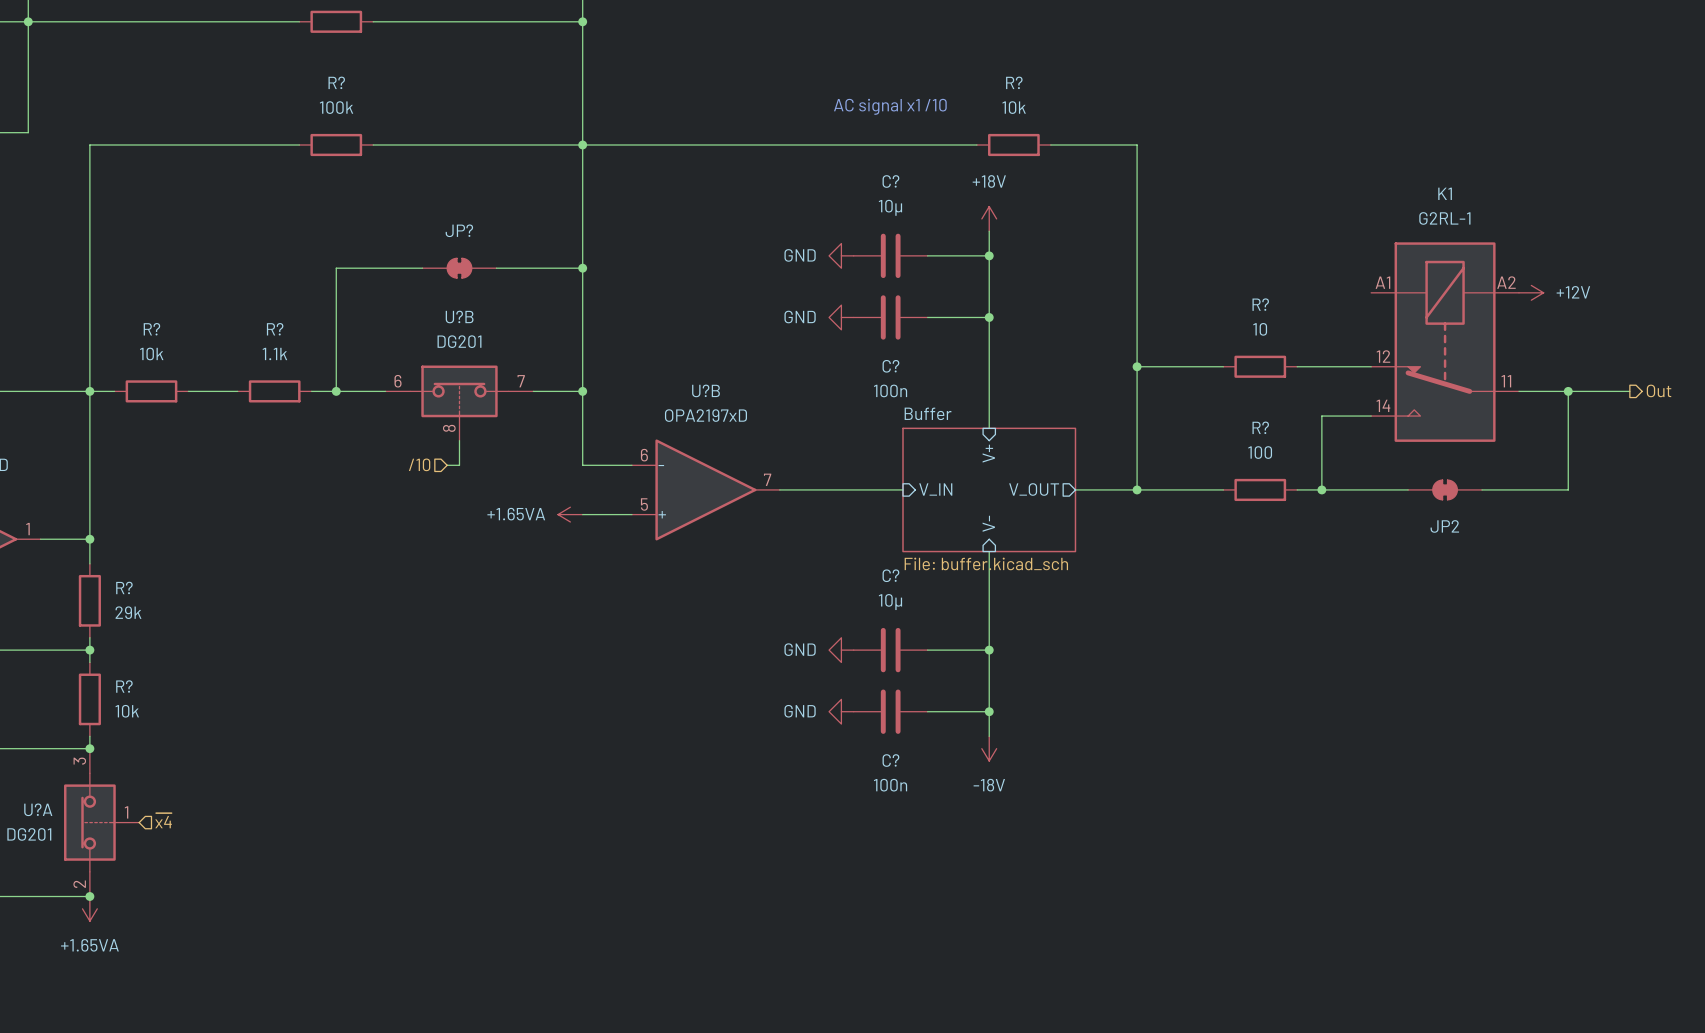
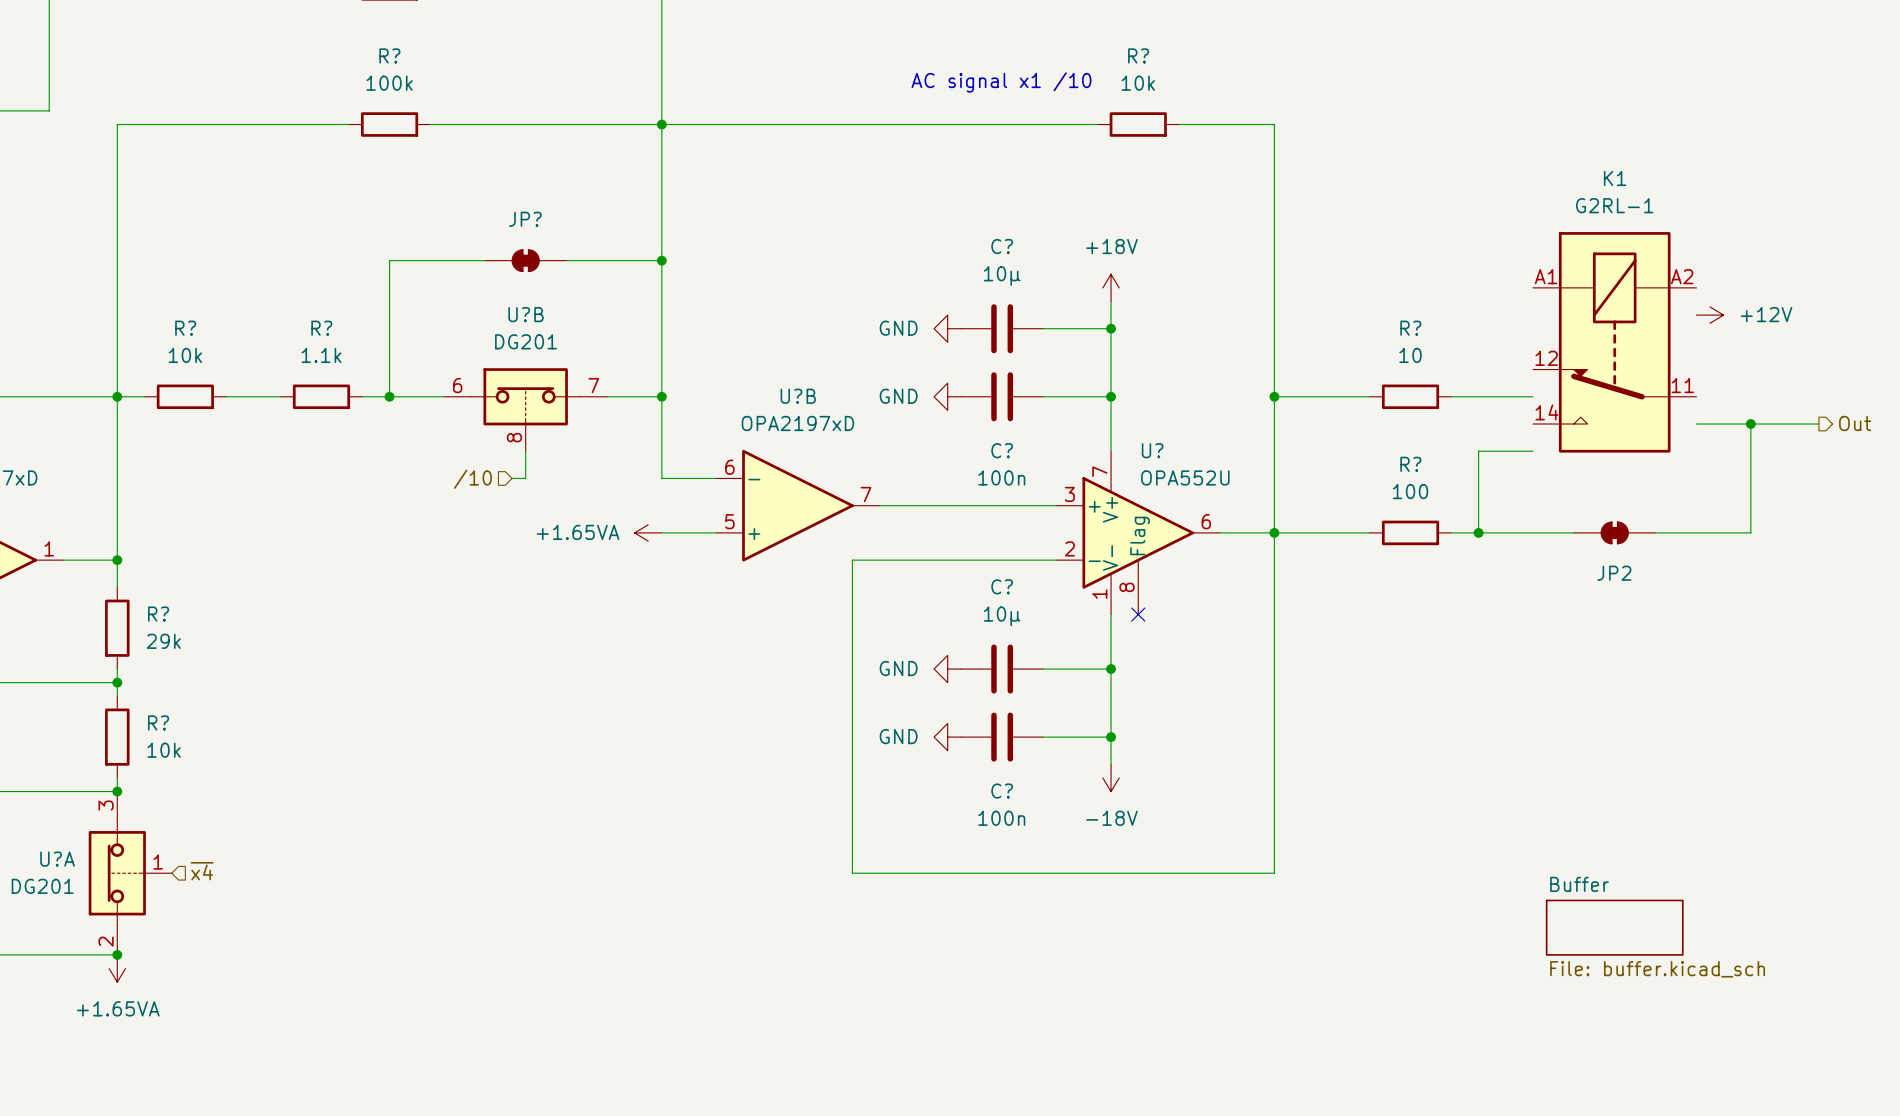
power symbol position: +18V (989, 218) -> +18V (1111, 287)
wire: (989, 231) (989, 305) -> none
power symbol: GND (841, 255) -> none
C? position: (890, 255) -> (1002, 328)
wire: (927, 255) (989, 255) -> (1042, 328) (1111, 328)
junction: (989, 255) -> none
power symbol position: +12V (1531, 292) -> +12V (1710, 315)
power symbol position: GND (841, 317) -> GND (947, 328)
C? position: (890, 317) -> (1002, 396)
wire: (927, 317) (989, 317) -> (1042, 396) (1111, 396)
junction position: (989, 317) -> (1111, 328)
wire: (1137, 366) (1223, 366) -> (1274, 396) (1369, 396)
junction position: (1137, 366) -> (1274, 396)
R? position: (1260, 366) -> (1410, 396)
wire: (1297, 366) (1371, 366) -> (1451, 396) (1533, 396)
hierarchical label position: Out (1659, 390) -> Out (1855, 423)
power symbol: none -> GND (947, 396)
junction: none -> (1111, 396)
wire: (1518, 391) (1629, 391) -> (1696, 424) (1818, 424)
wire: (1568, 391) (1568, 416) -> none
junction position: (1568, 391) -> (1750, 424)
wire: (1371, 416) (1321, 416) (1321, 440) -> (1533, 451) (1478, 451)
wire: none -> (1111, 437) (1111, 451)
sheet pin: V+ (988, 453) -> none
wire: none -> (1015, 505) (1056, 505)
sheet pin: V_IN (935, 489) -> none
sheet Buffer: File: buffer.kicad_sch (989, 489) -> none
sheet pin: V_OUT (1034, 489) -> none
wire: (1075, 489) (1223, 489) -> none
wire: none -> (1274, 505) (1274, 873) (852, 873) (852, 560) (1056, 560)
junction position: (1137, 489) -> (1274, 532)
R? position: (1260, 489) -> (1410, 532)
wire: (1297, 489) (1408, 489) -> (1451, 532) (1573, 532)
wire: none -> (1478, 505) (1478, 532)
junction position: (1321, 489) -> (1478, 532)
JP2 position: (1445, 489) -> (1614, 532)
wire: (1482, 489) (1568, 489) -> (1655, 532) (1750, 532) (1750, 505)
U?: none -> OPA552U (1138, 532)
wire: none -> (1219, 532) (1369, 532)
sheet pin: V- (988, 523) -> none
no-connect mark: none -> (1138, 614)
power symbol position: GND (841, 650) -> GND (947, 669)
C? position: (890, 650) -> (1002, 669)
wire: (927, 650) (989, 650) -> (1042, 669) (1111, 669)
junction position: (989, 650) -> (1111, 669)
power symbol position: GND (841, 711) -> GND (947, 737)
C? position: (890, 711) -> (1002, 737)
wire: (927, 711) (989, 711) -> (1042, 737) (1111, 737)
junction position: (989, 711) -> (1111, 737)
power symbol position: -18V (989, 748) -> -18V (1111, 777)
sheet Buffer: none -> File: buffer.kicad_sch (1614, 927)

